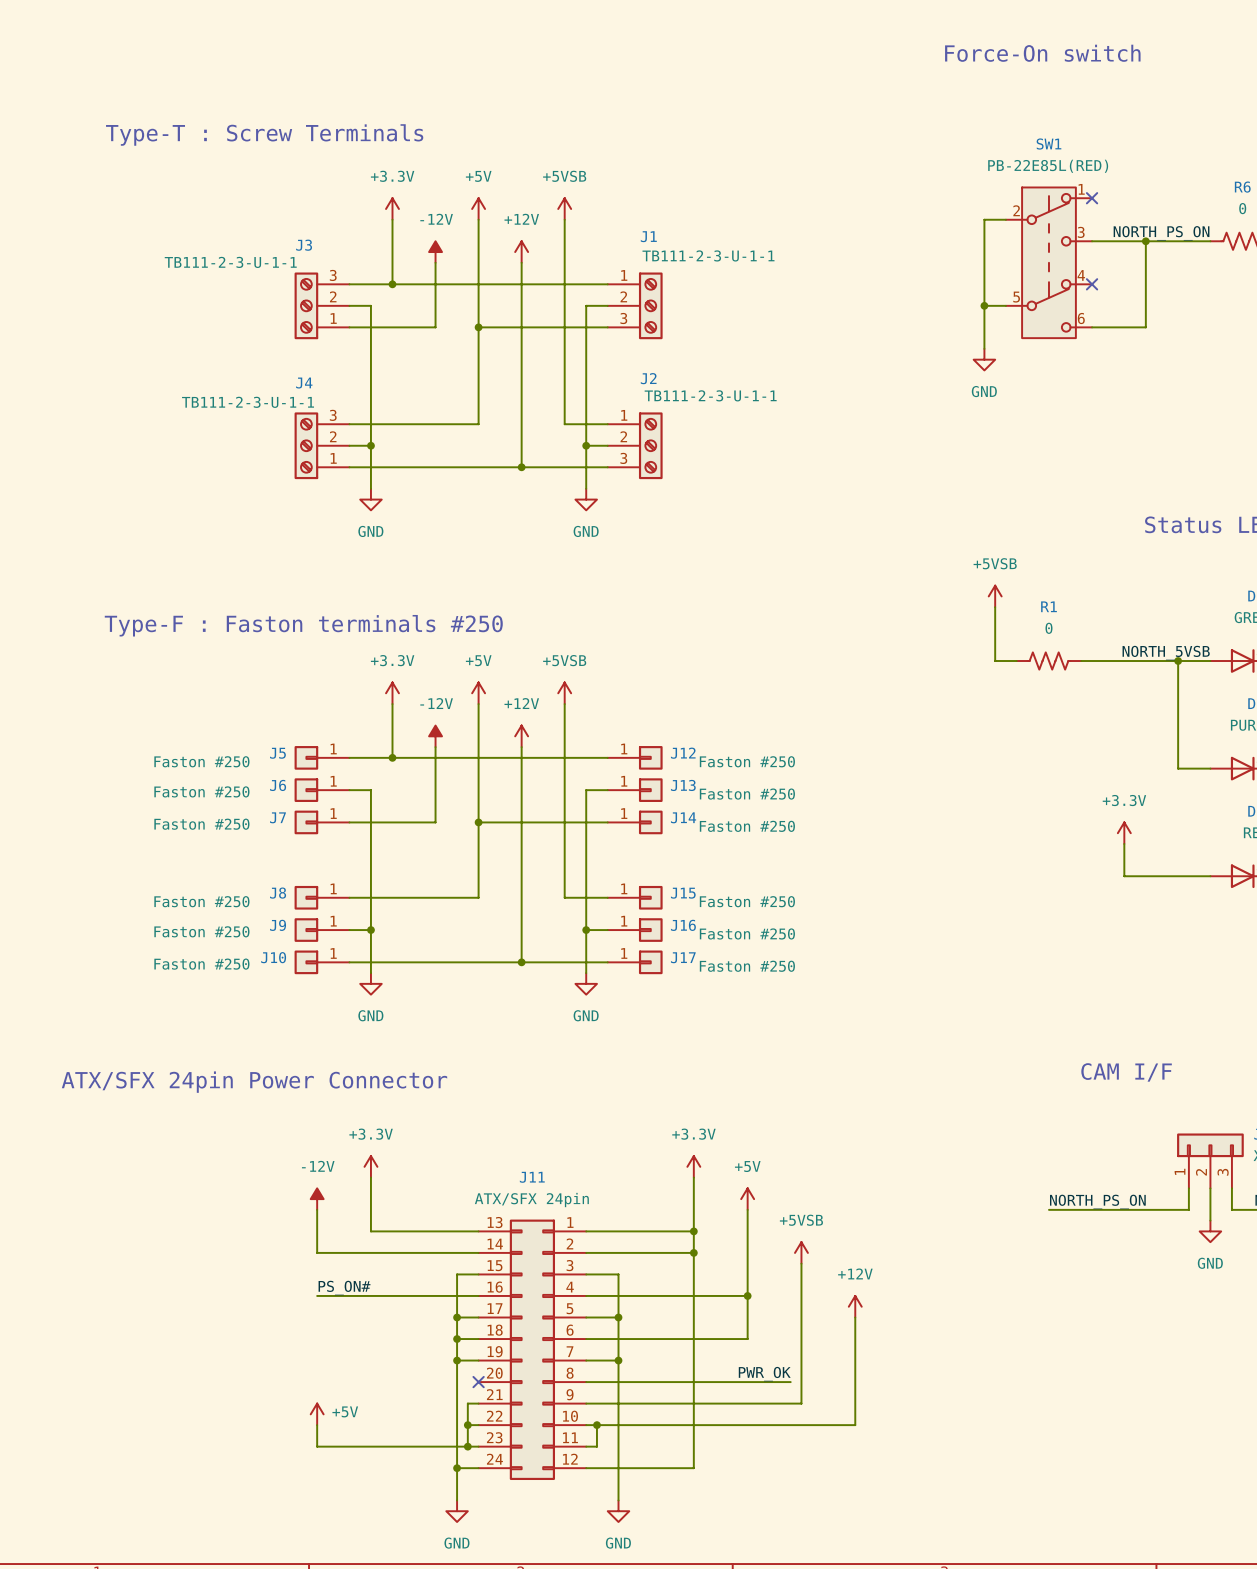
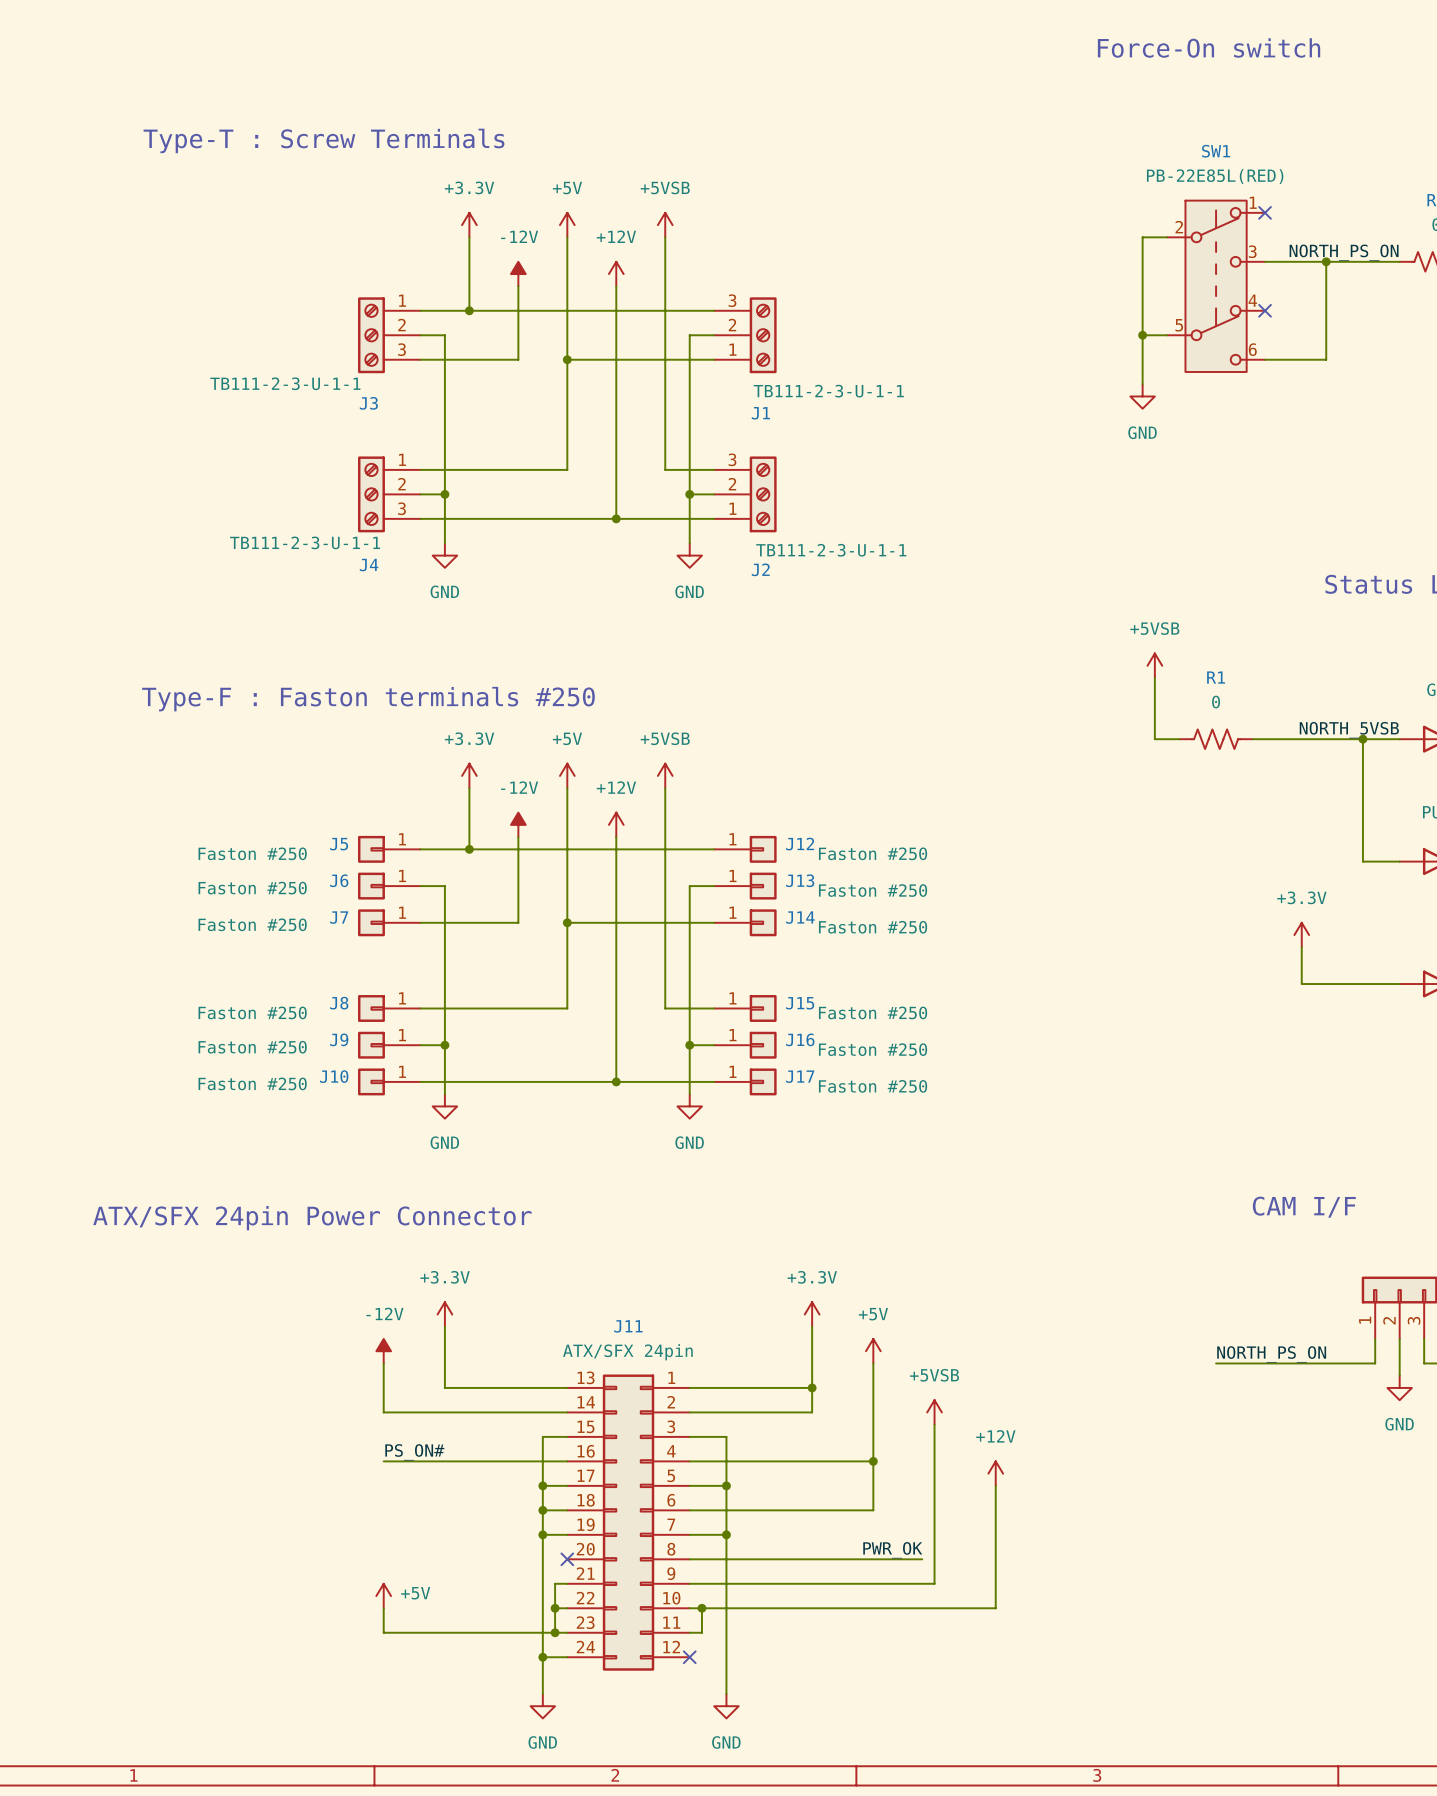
J3 flip: as is (306, 305) -> up-down (371, 335)
J1 flip: as is (650, 305) -> up-down (763, 335)
J4 flip: as is (306, 445) -> up-down (371, 494)
J2 flip: as is (650, 445) -> up-down (763, 494)
wire: (693, 1252) (693, 1468) (586, 1468) -> none
junction: (693, 1252) -> none
no-connect mark: none -> (689, 1657)

